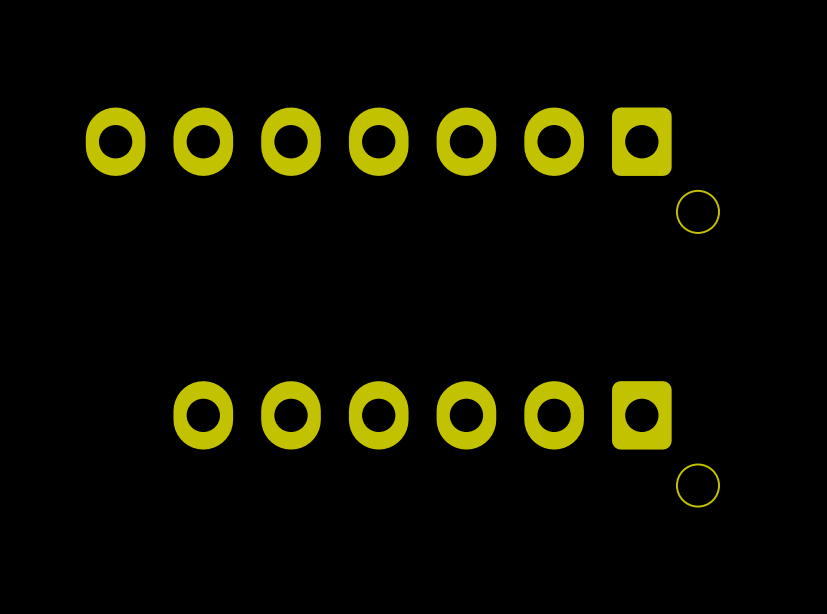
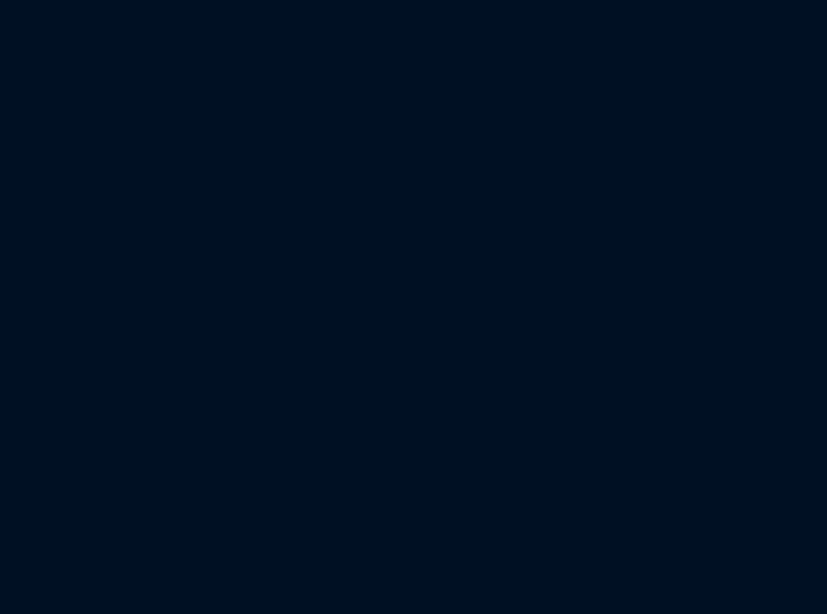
part: (402, 170) -> none
part: (446, 443) -> none

